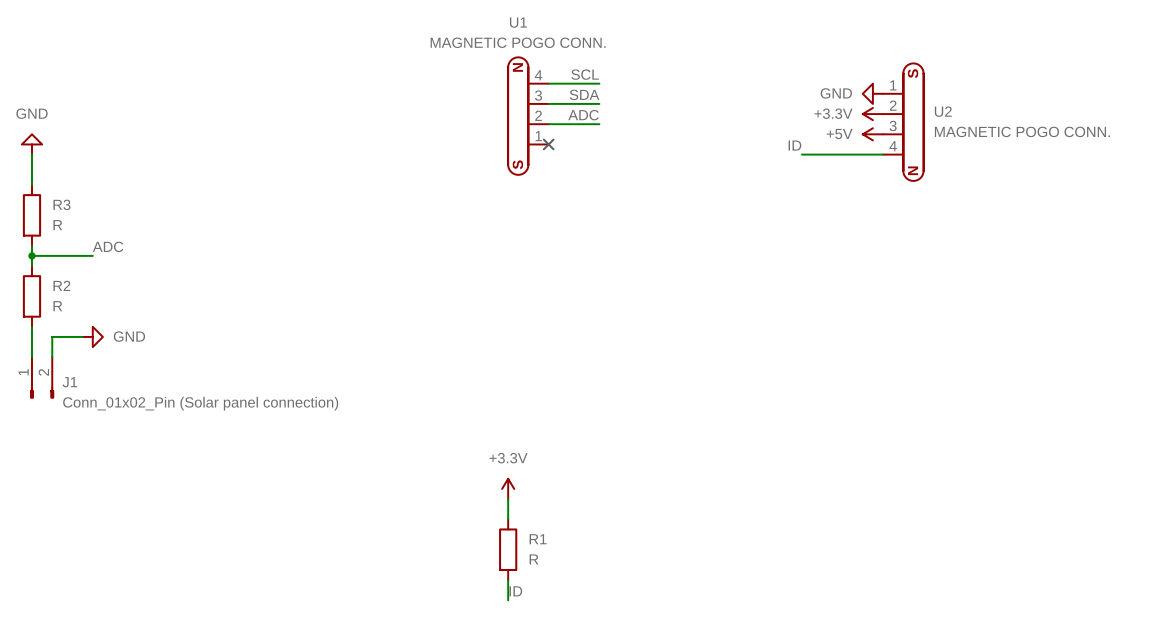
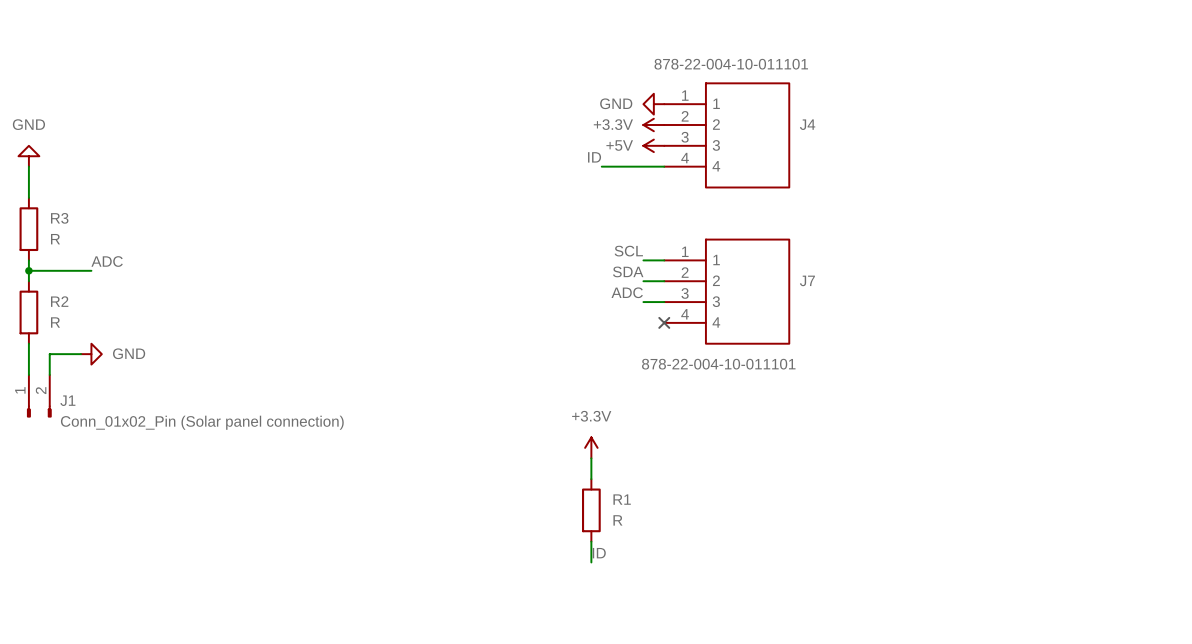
label position: SCL (585, 74) -> SCL (628, 251)
wire: (548, 83) (599, 83) -> none
power symbol: none -> GND (653, 104)
power symbol: GND (872, 93) -> none
label position: SDA (584, 94) -> SDA (628, 271)
wire: (548, 103) (599, 103) -> none
power symbol: none -> +3.3V (653, 125)
power symbol: +3.3V (872, 114) -> none
label position: ADC (583, 115) -> ADC (627, 292)
U1: MAGNETIC POGO CONN. (528, 116) -> none
U2: MAGNETIC POGO CONN. (903, 122) -> none
wire: (548, 124) (599, 124) -> none
J4: none -> 878-22-004-10-011101 (727, 135)
power symbol: none -> +5V (653, 145)
power symbol: +5V (872, 134) -> none
no-connect mark: (548, 144) -> none
label: none -> ID (594, 157)
label: ID (794, 145) -> none
wire: none -> (601, 166) (664, 166)
wire: (801, 154) (883, 154) -> none
wire: none -> (643, 260) (664, 260)
wire: none -> (643, 281) (664, 281)
J7: none -> 878-22-004-10-011101 (727, 291)
wire: none -> (643, 302) (664, 302)
no-connect mark: none -> (664, 322)
power symbol position: +3.3V (508, 488) -> +3.3V (591, 447)
wire: (508, 499) (508, 519) -> (591, 458) (591, 479)
R1 position: (508, 549) -> (591, 510)
wire: (508, 580) (508, 600) -> (591, 541) (591, 562)
label position: ID (515, 591) -> ID (599, 553)

